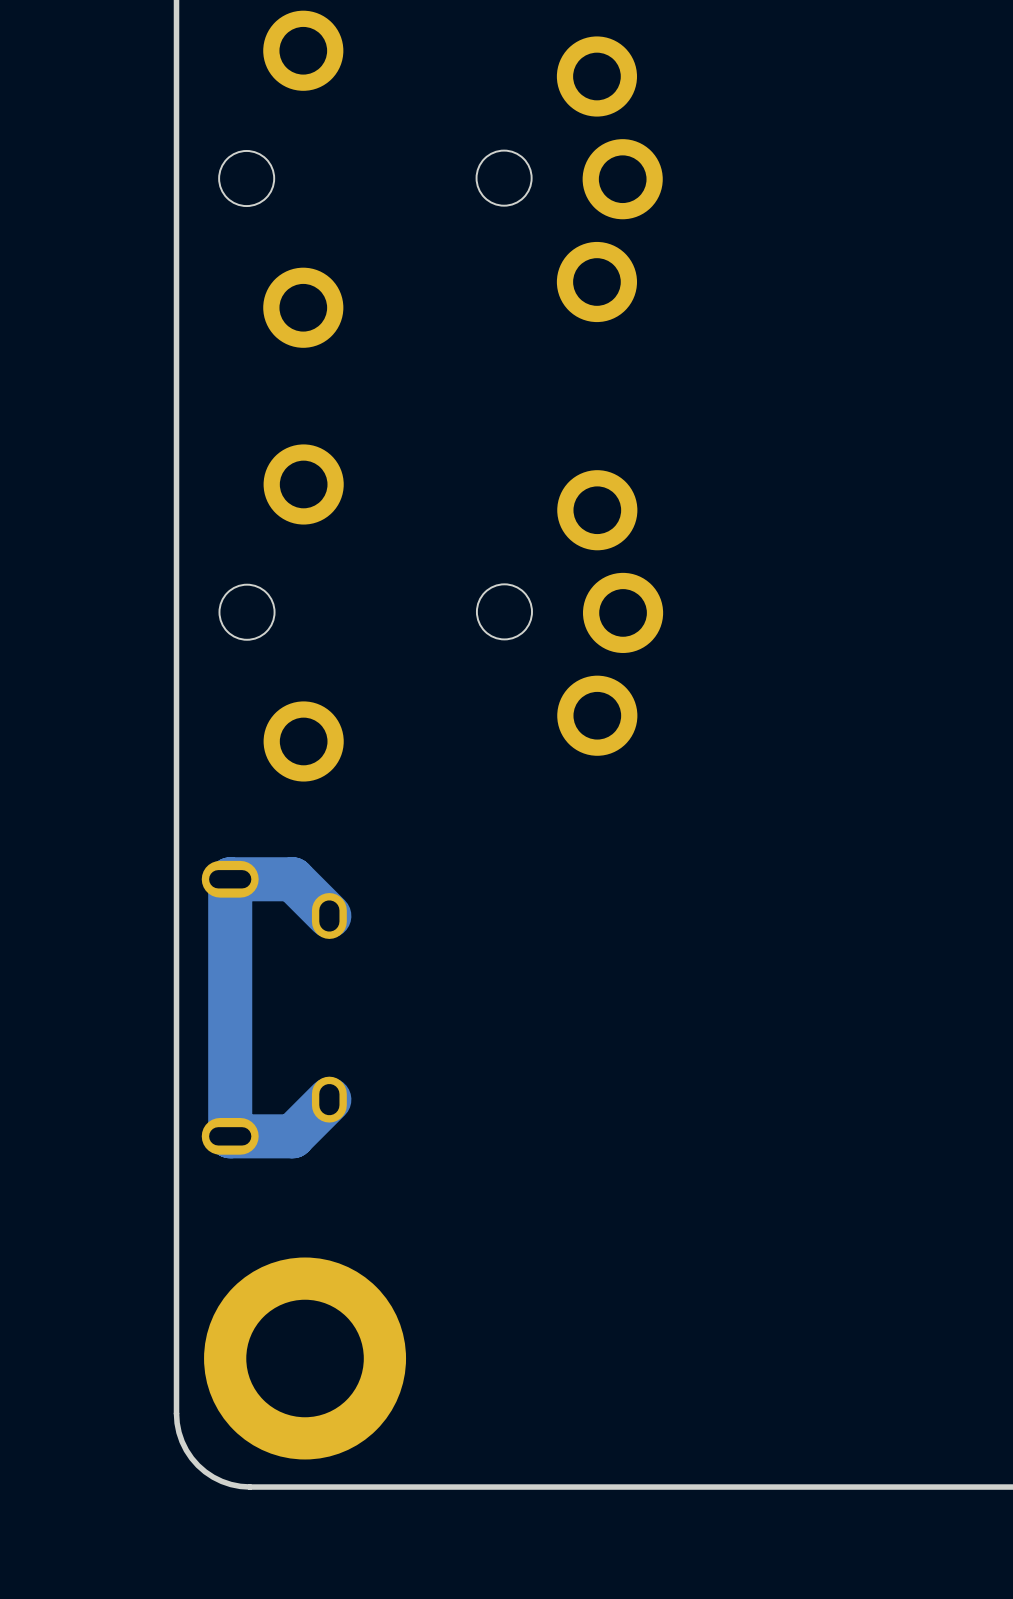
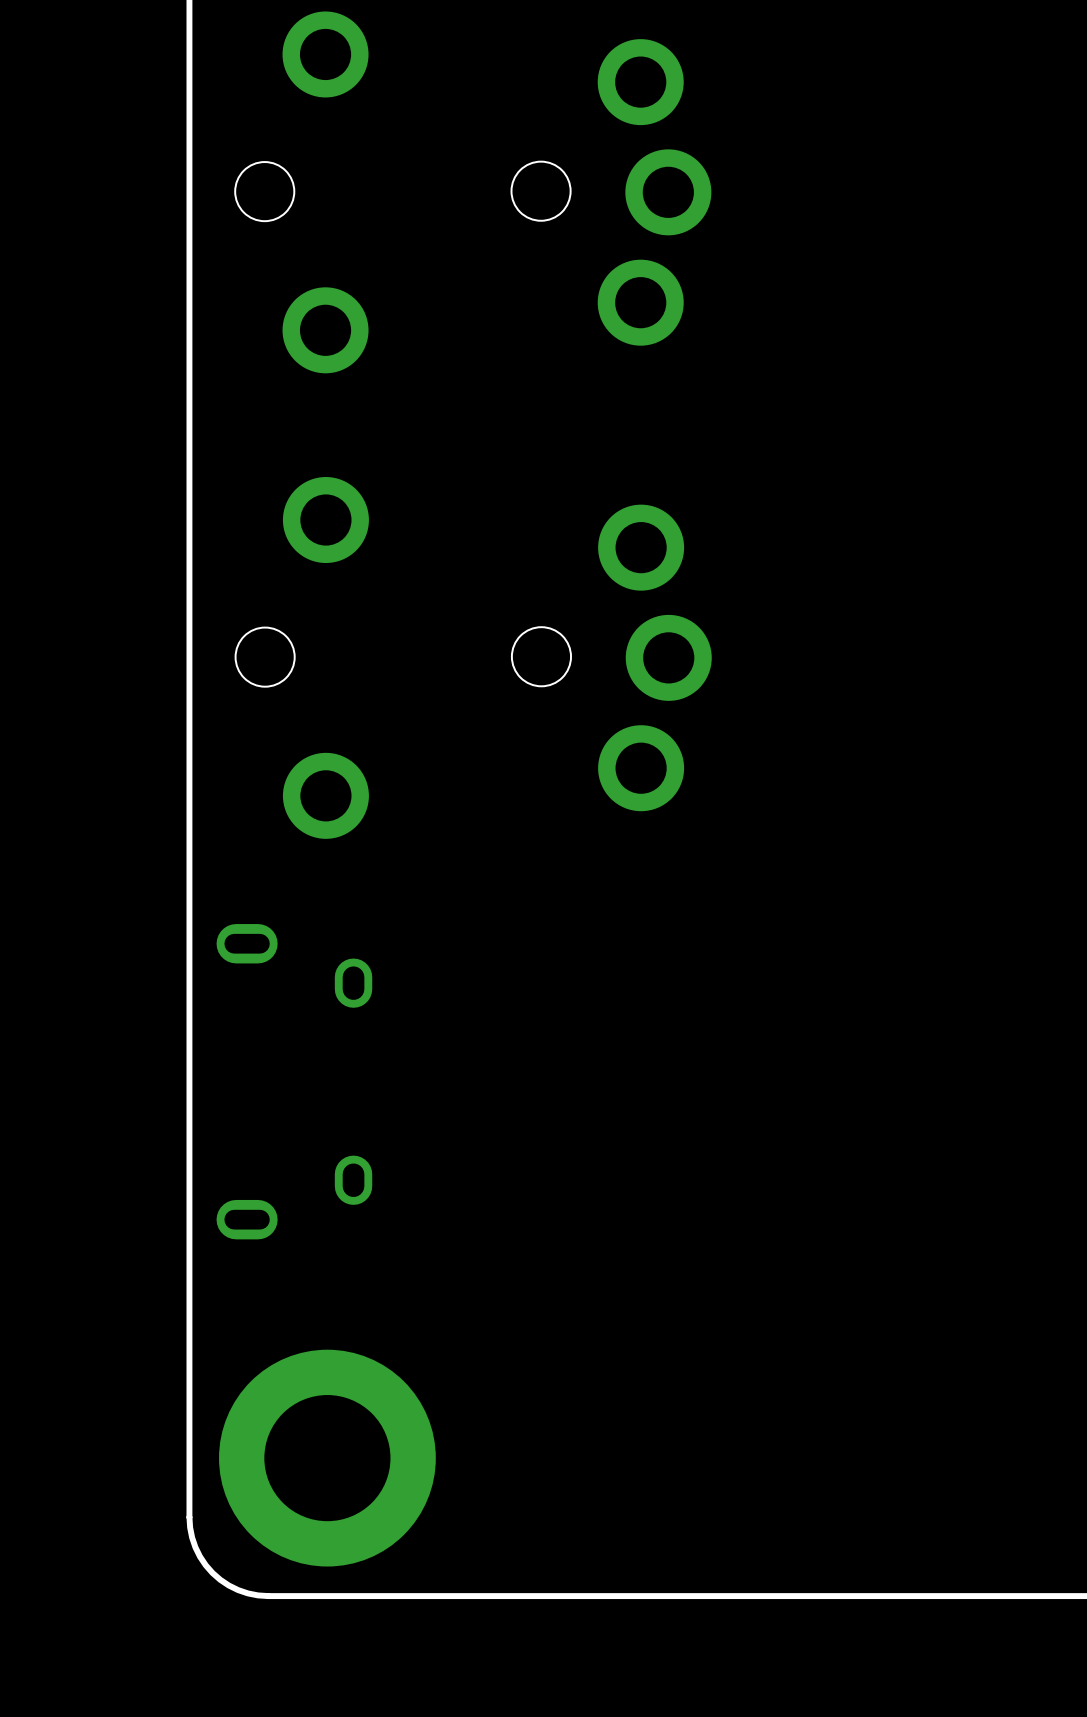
track: (329, 915) (292, 879) (230, 879) (230, 1136) (292, 1136) (329, 1099) -> none

